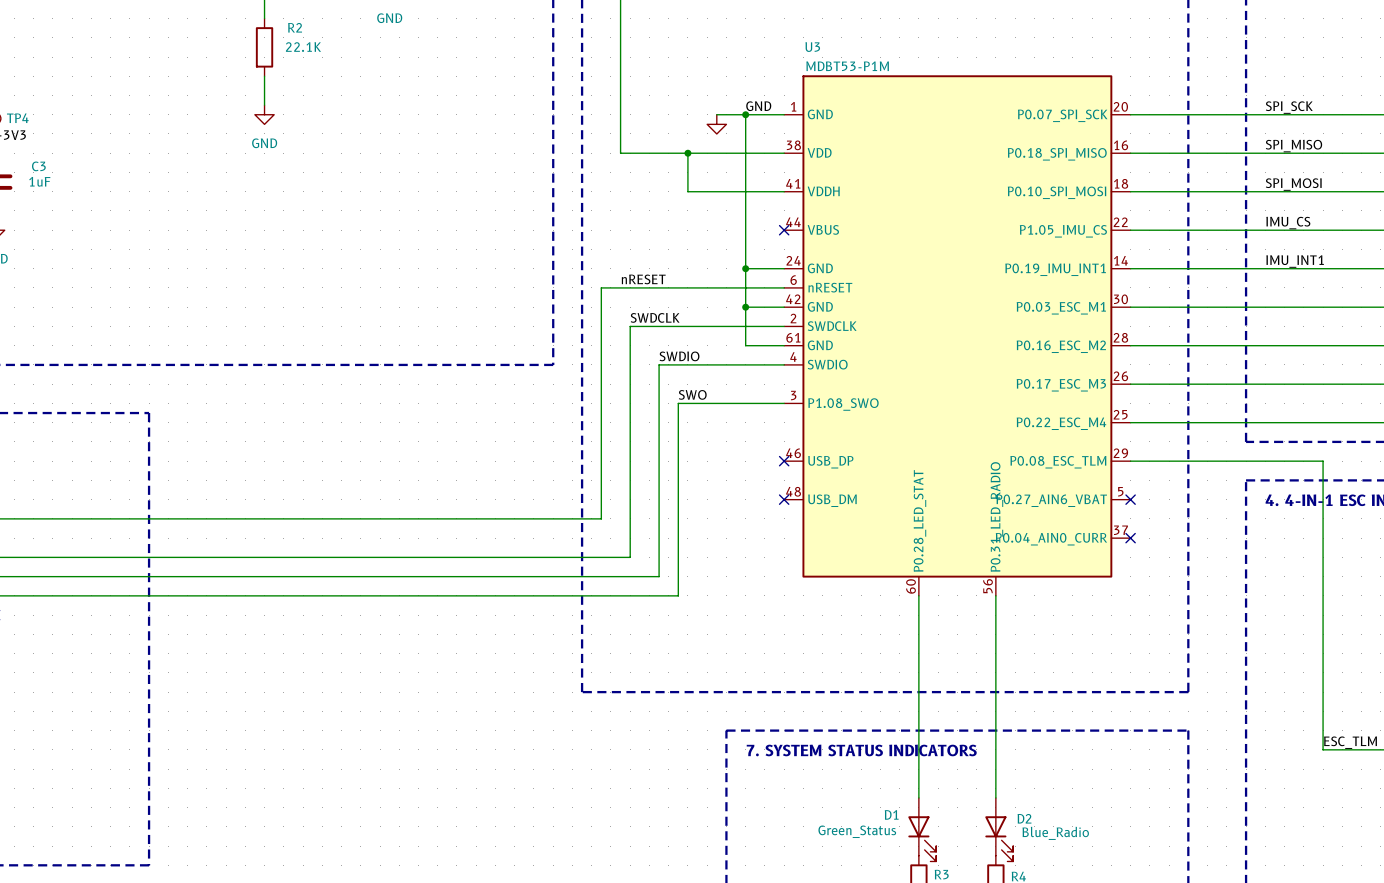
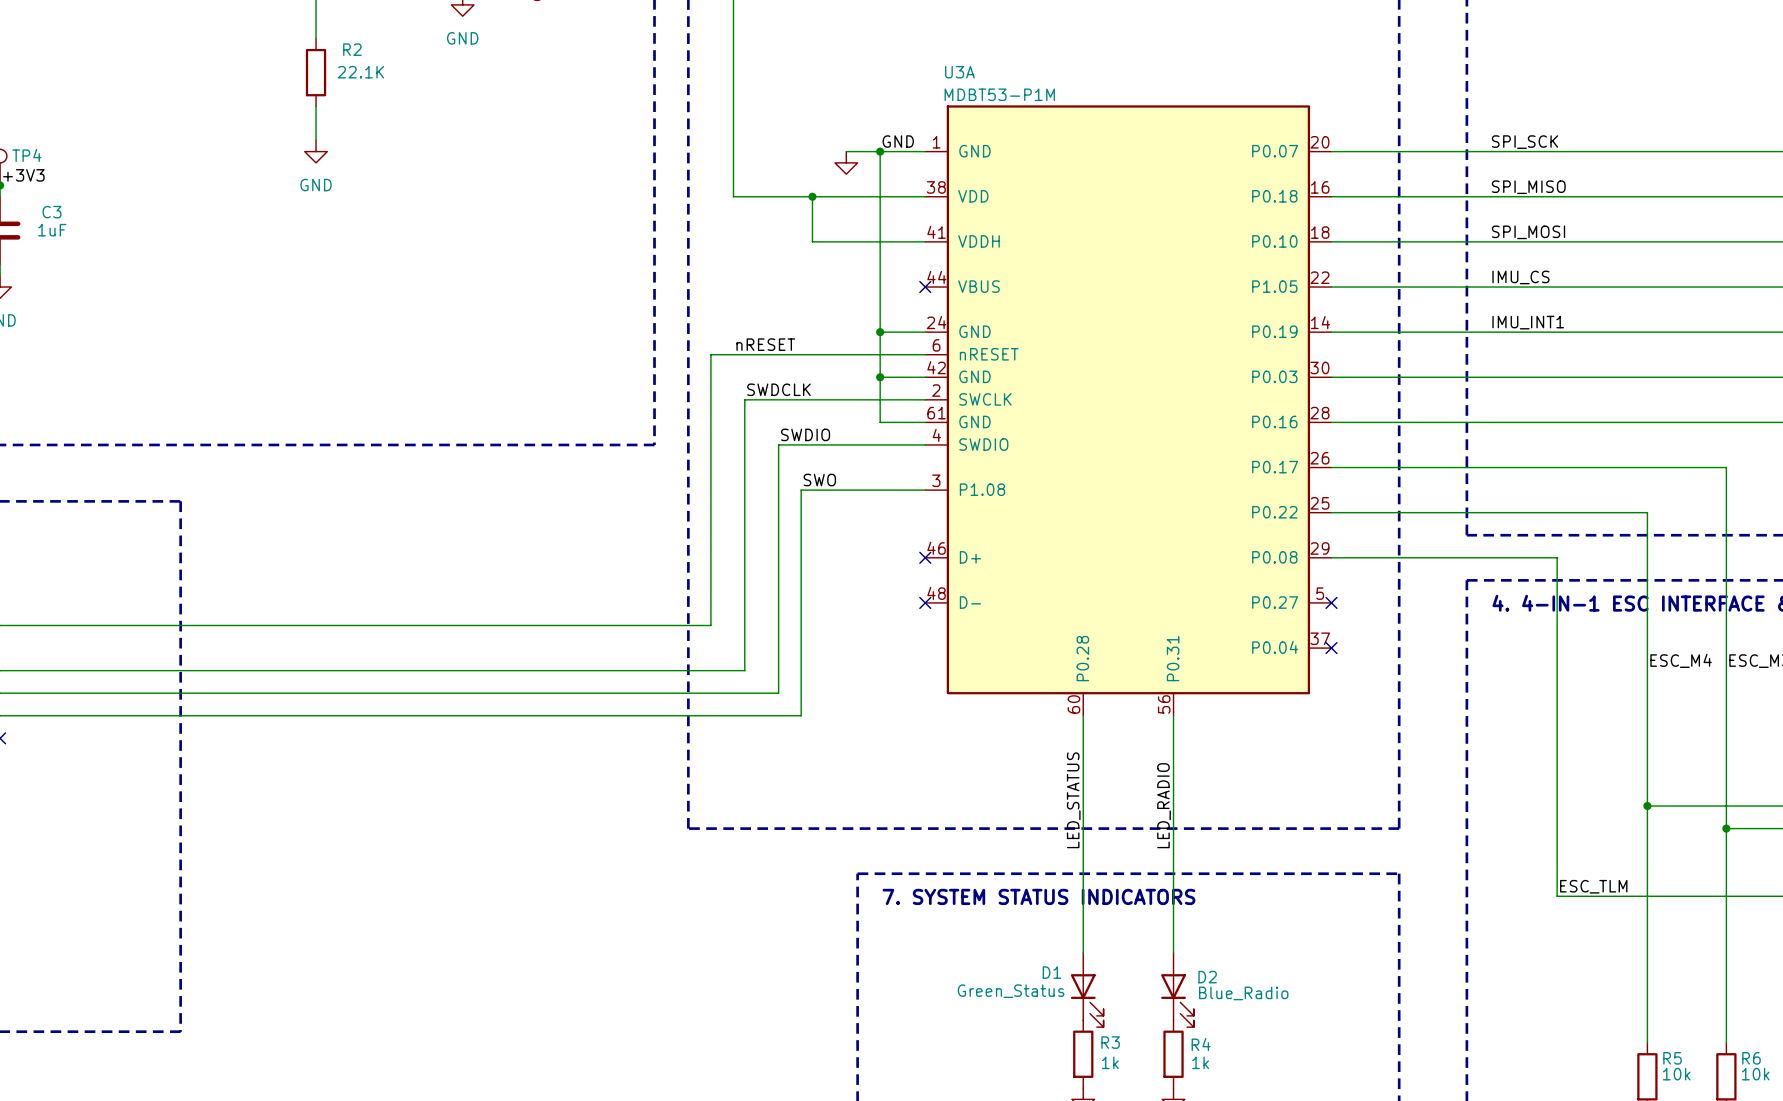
U3 name: U3 (812, 47) -> U3A (959, 72)
U3 symbol: [784, 75, 1131, 596] -> [925, 105, 1332, 716]
label: none -> LED_STATUS (1073, 800)
label: none -> LED_RADIO (1163, 805)

